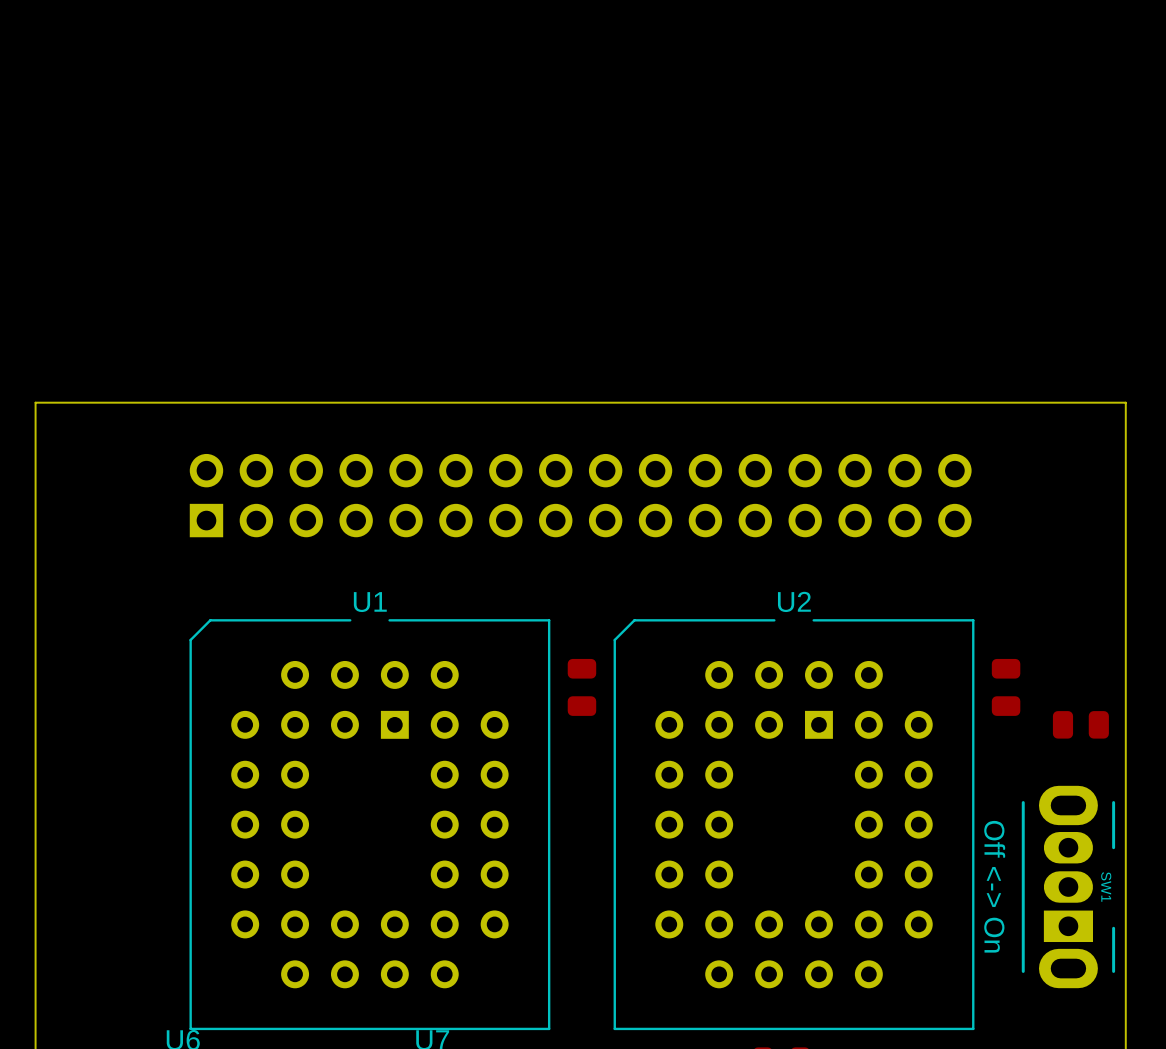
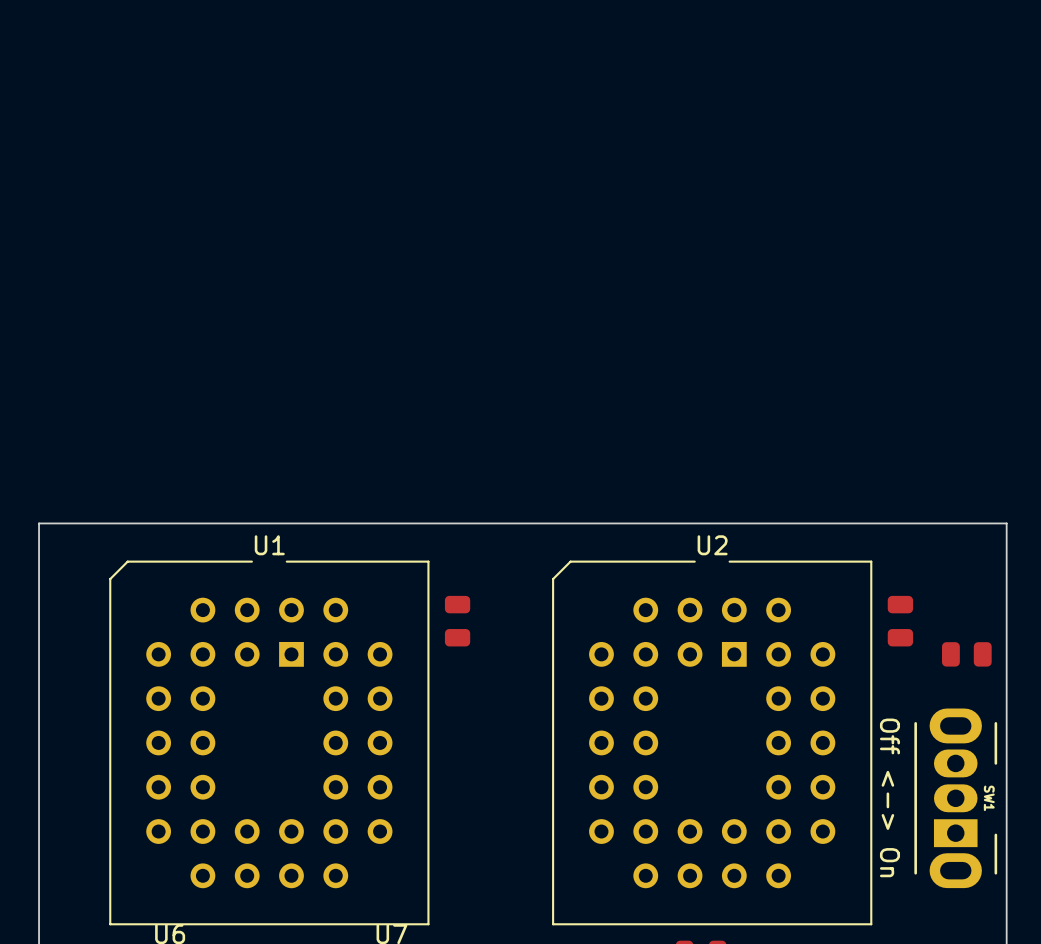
part: (580, 495) -> none
board edge: (1125, 577) (1125, 402) (35, 402) (35, 577) -> (1006, 523) (39, 523)
part position: (581, 687) -> (457, 621)
U1 position: (369, 824) -> (269, 742)

